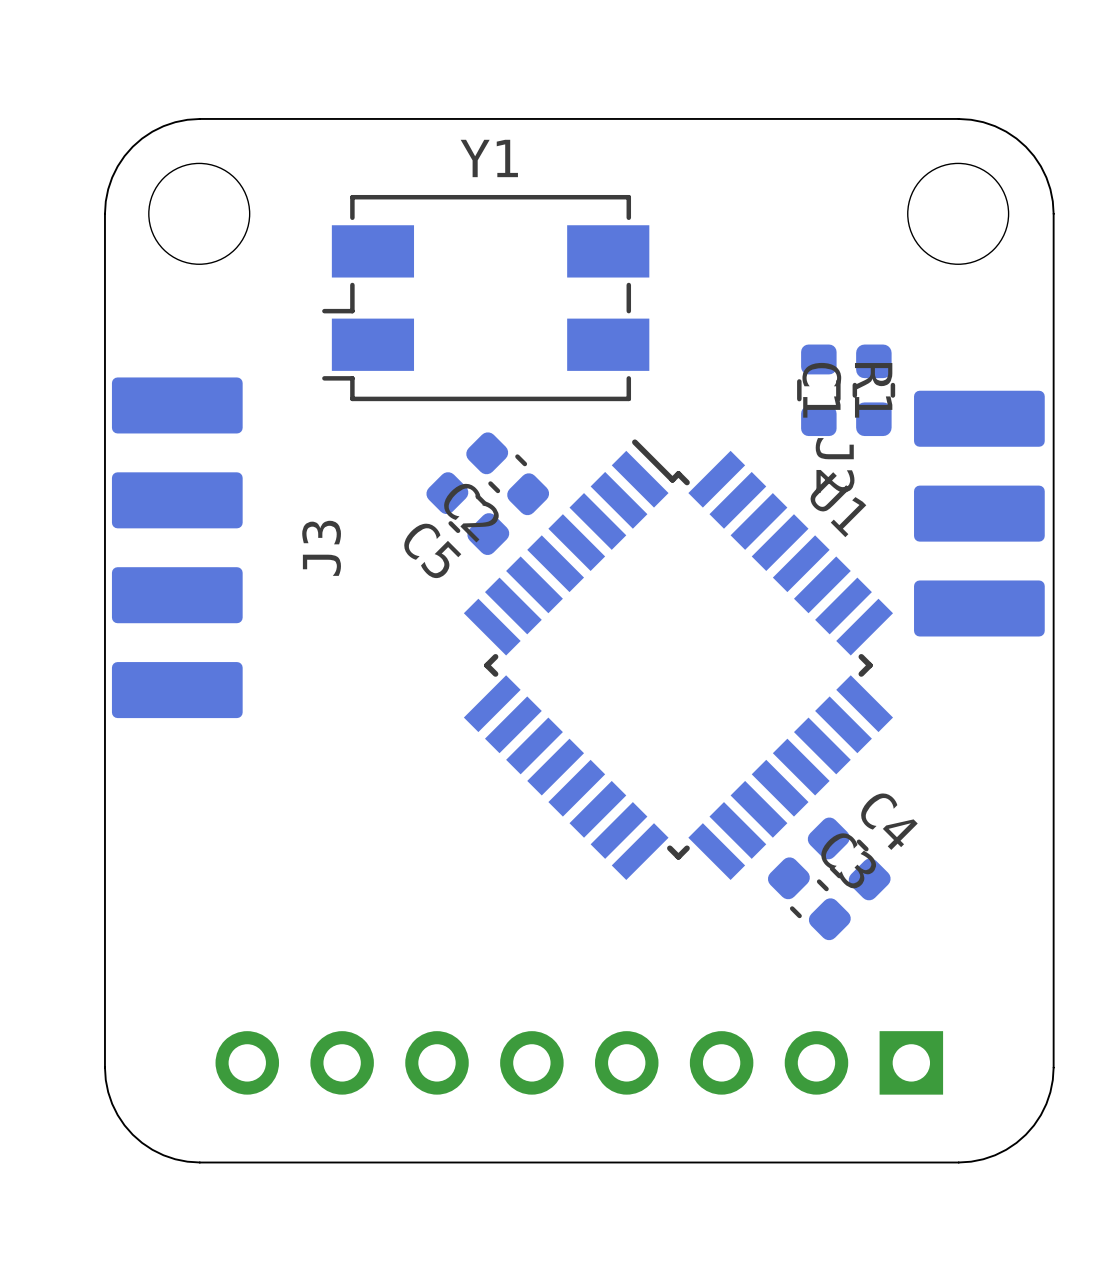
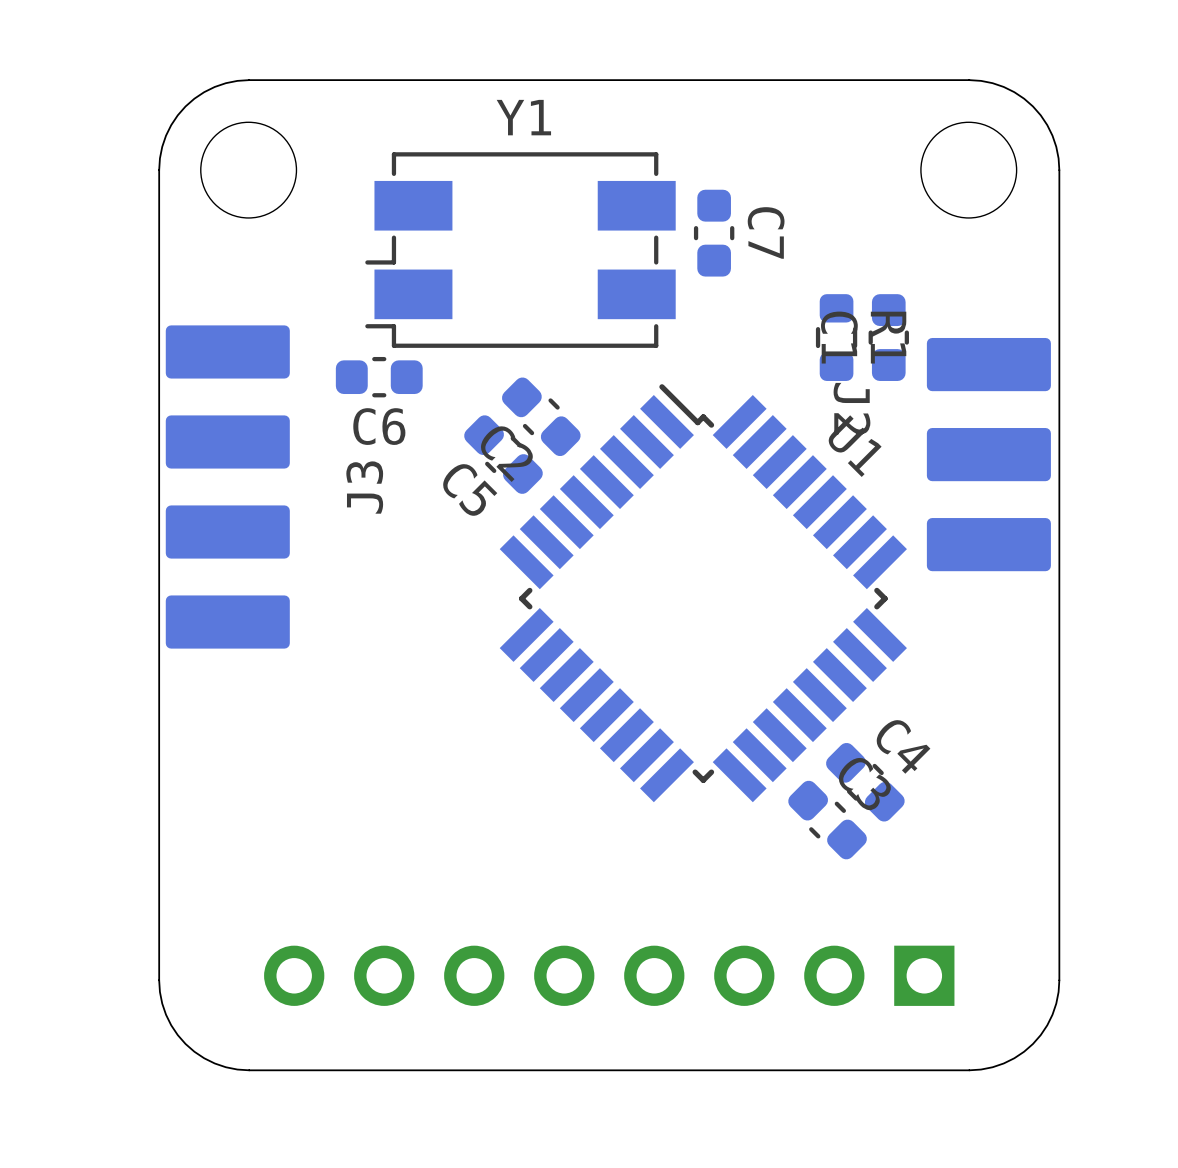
C7: none -> (714, 233)
C6: none -> (379, 377)

